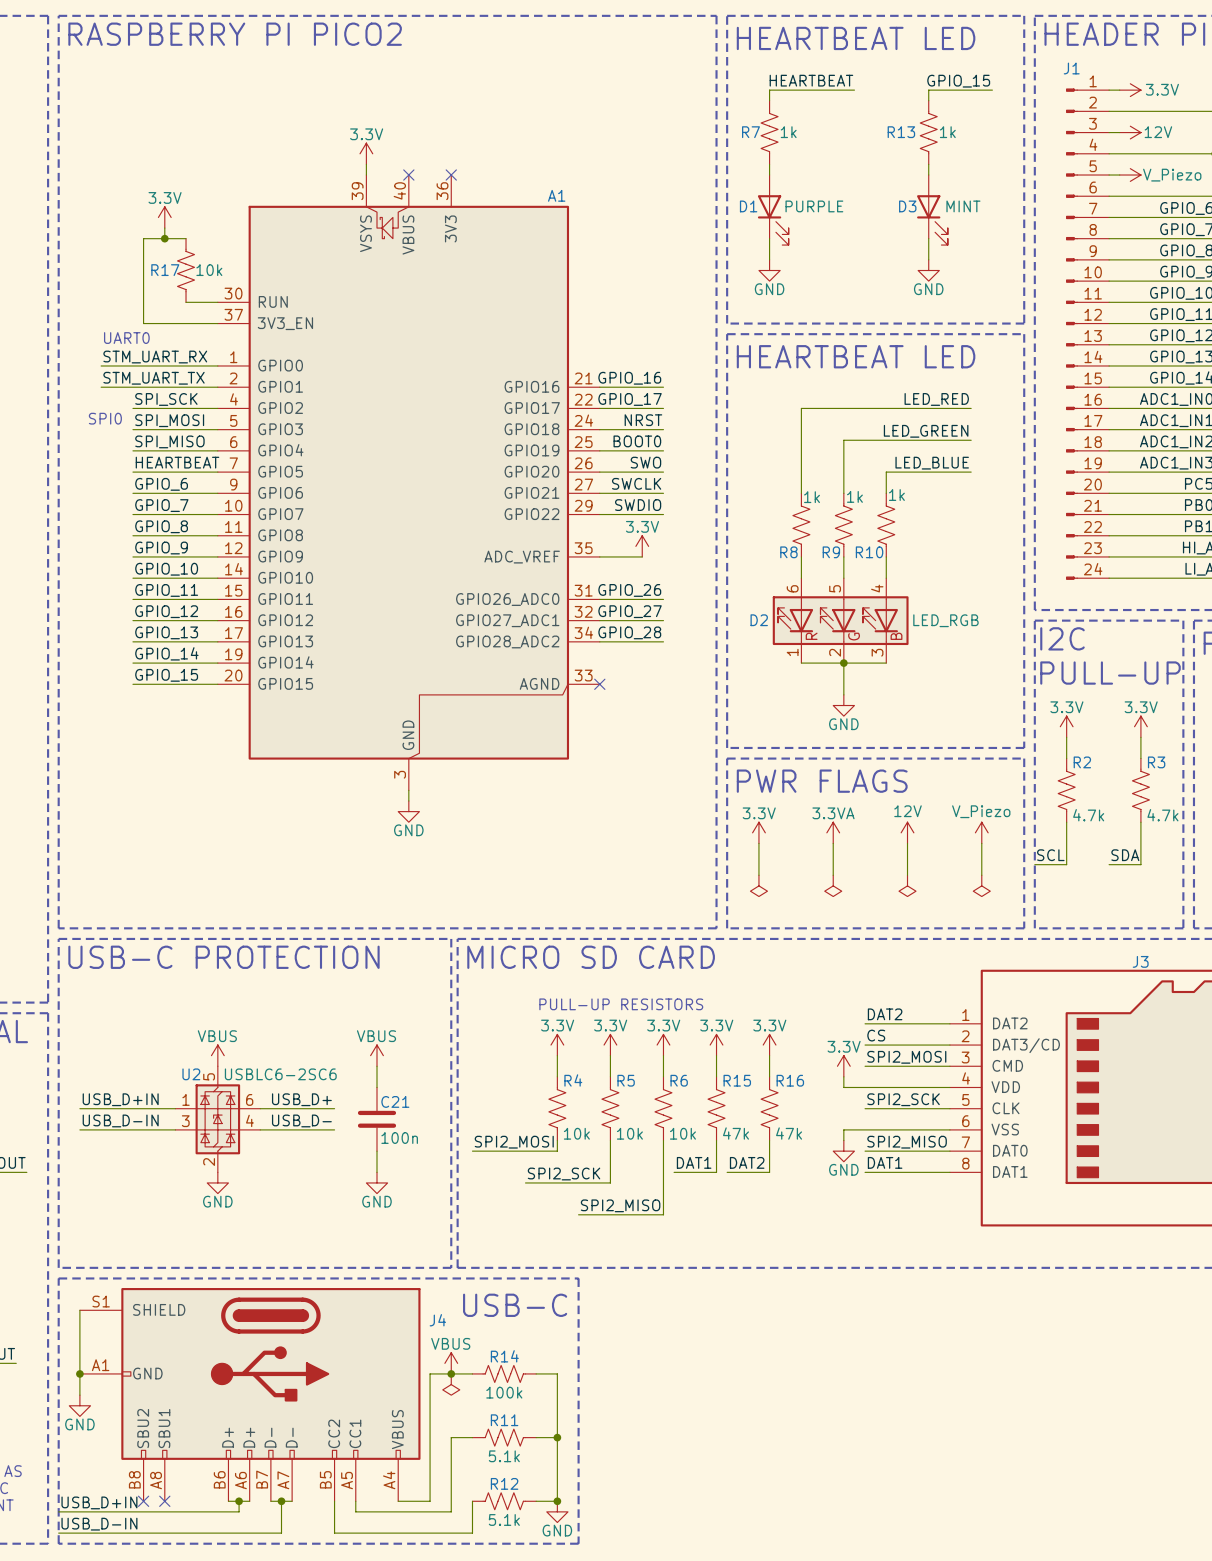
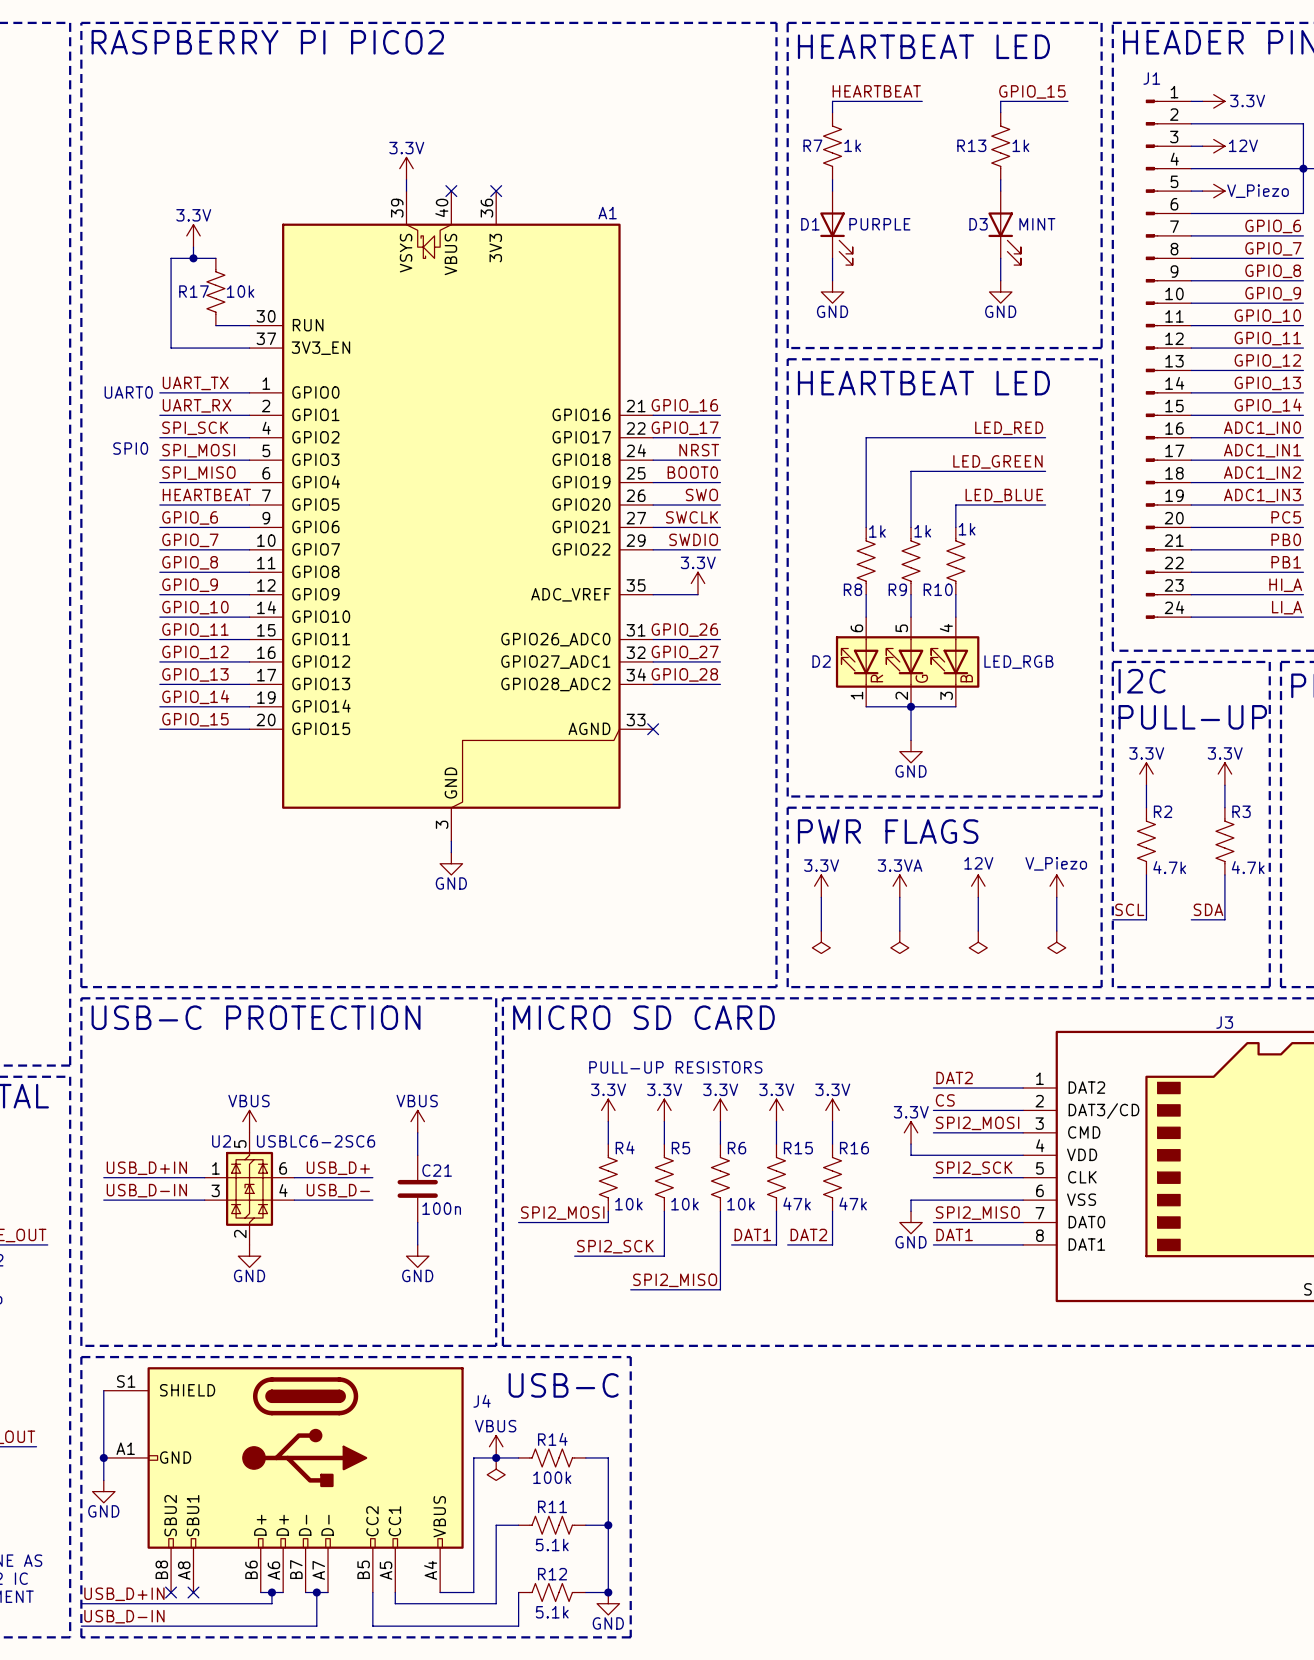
text position: UART0 (126, 338) -> UART0 (128, 392)
label: STM_UART_RX (155, 357) -> none
label: none -> UART_TX (195, 383)
wire: (101, 365) (132, 365) -> none
label: STM_UART_TX (154, 378) -> none
label: none -> UART_RX (197, 405)
wire: (101, 387) (132, 387) -> none

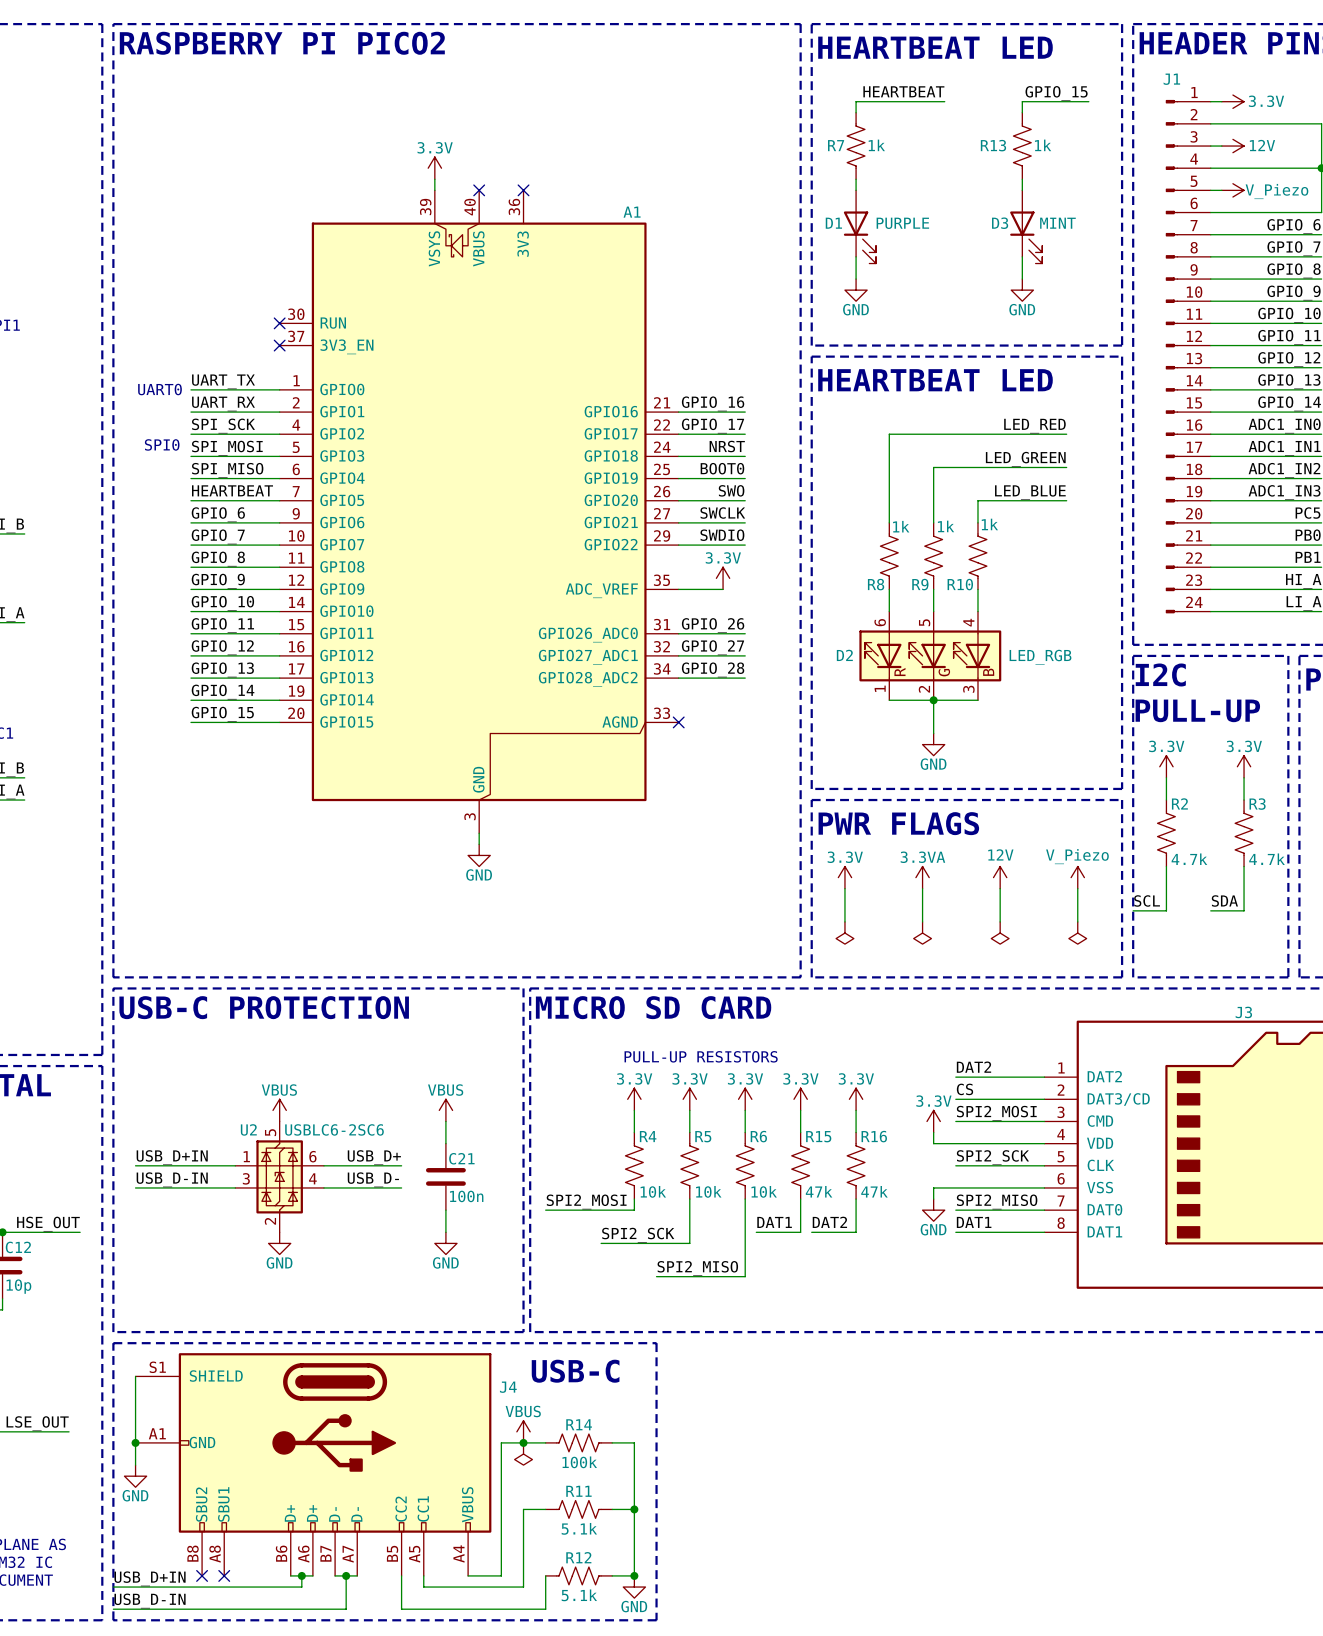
power symbol: 3.3V (193, 235) -> none
wire: (193, 247) (193, 258) -> none
junction: (193, 258) -> none
wire: (215, 258) (171, 258) (171, 348) (249, 348) -> none
R17: 10k (215, 291) -> none
wire: (215, 325) (249, 325) -> none
no-connect mark: none -> (279, 323)
no-connect mark: none -> (279, 345)

